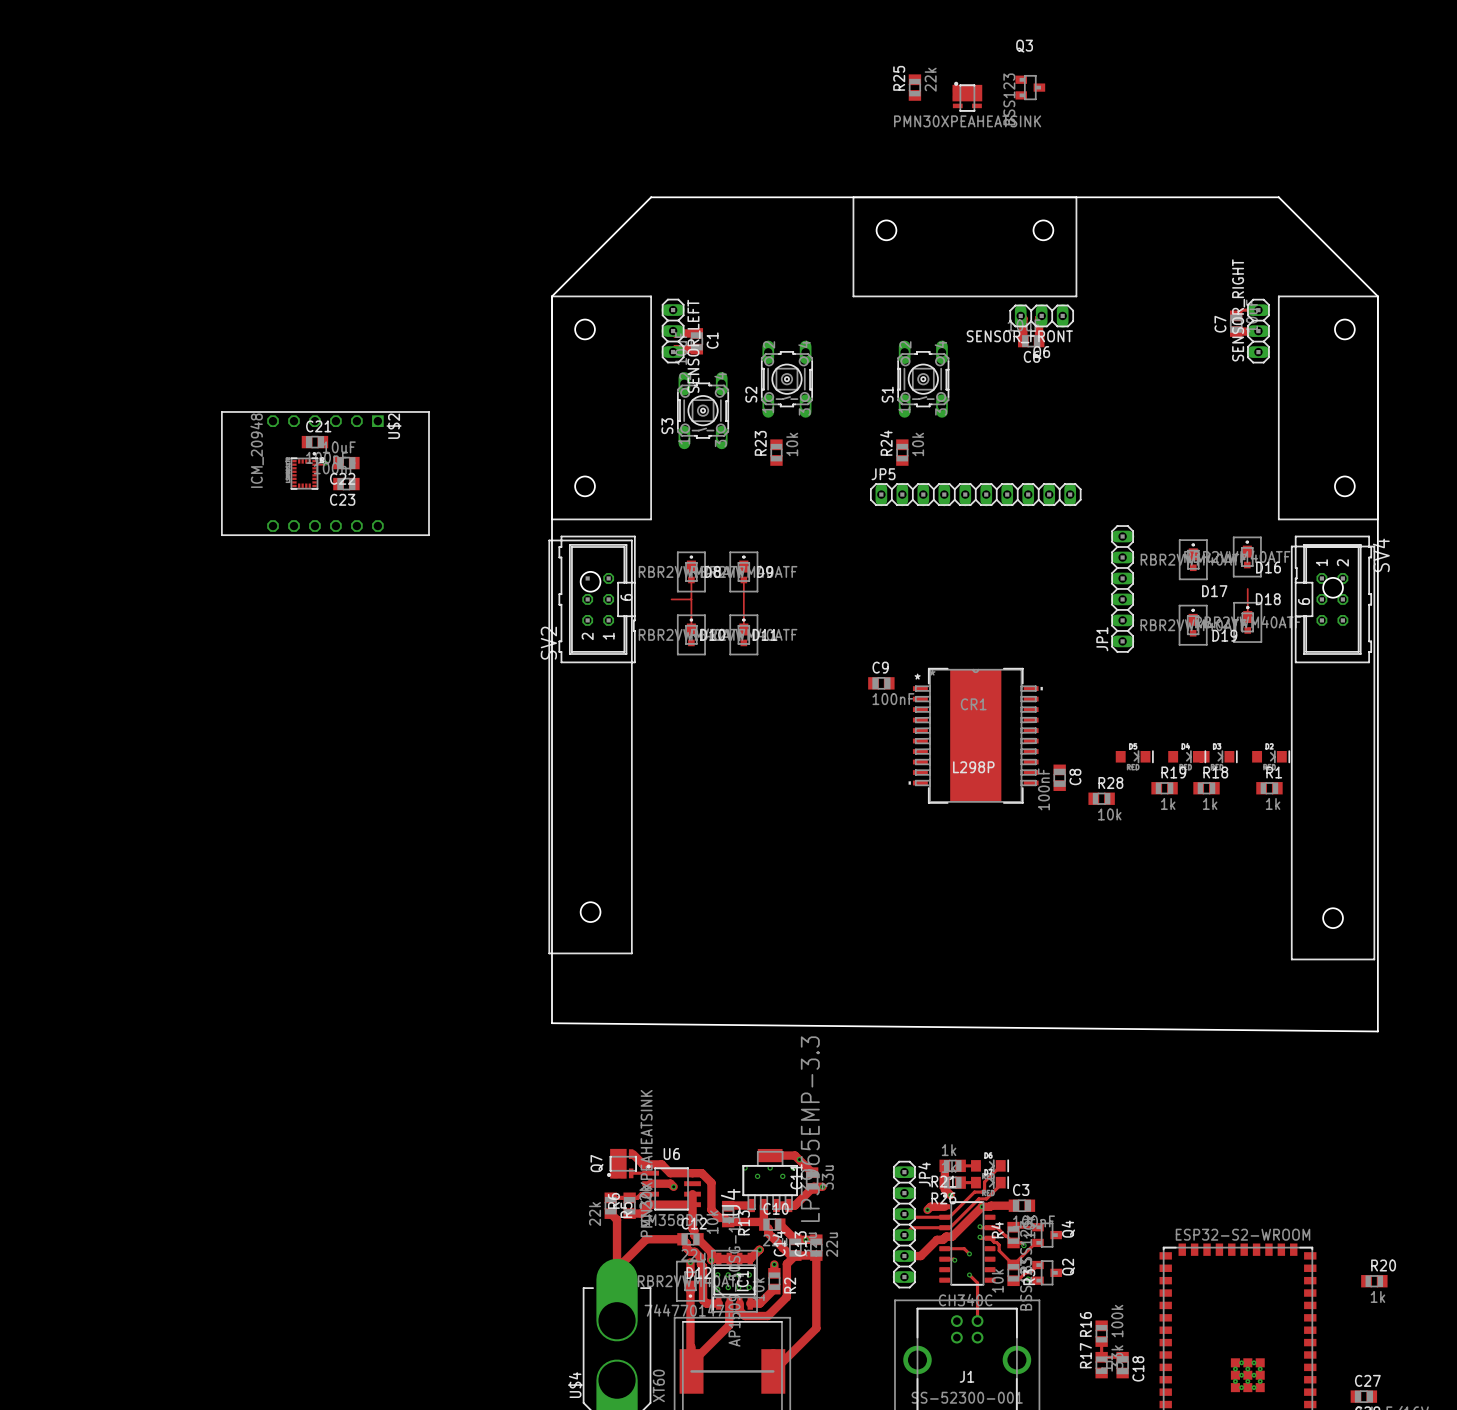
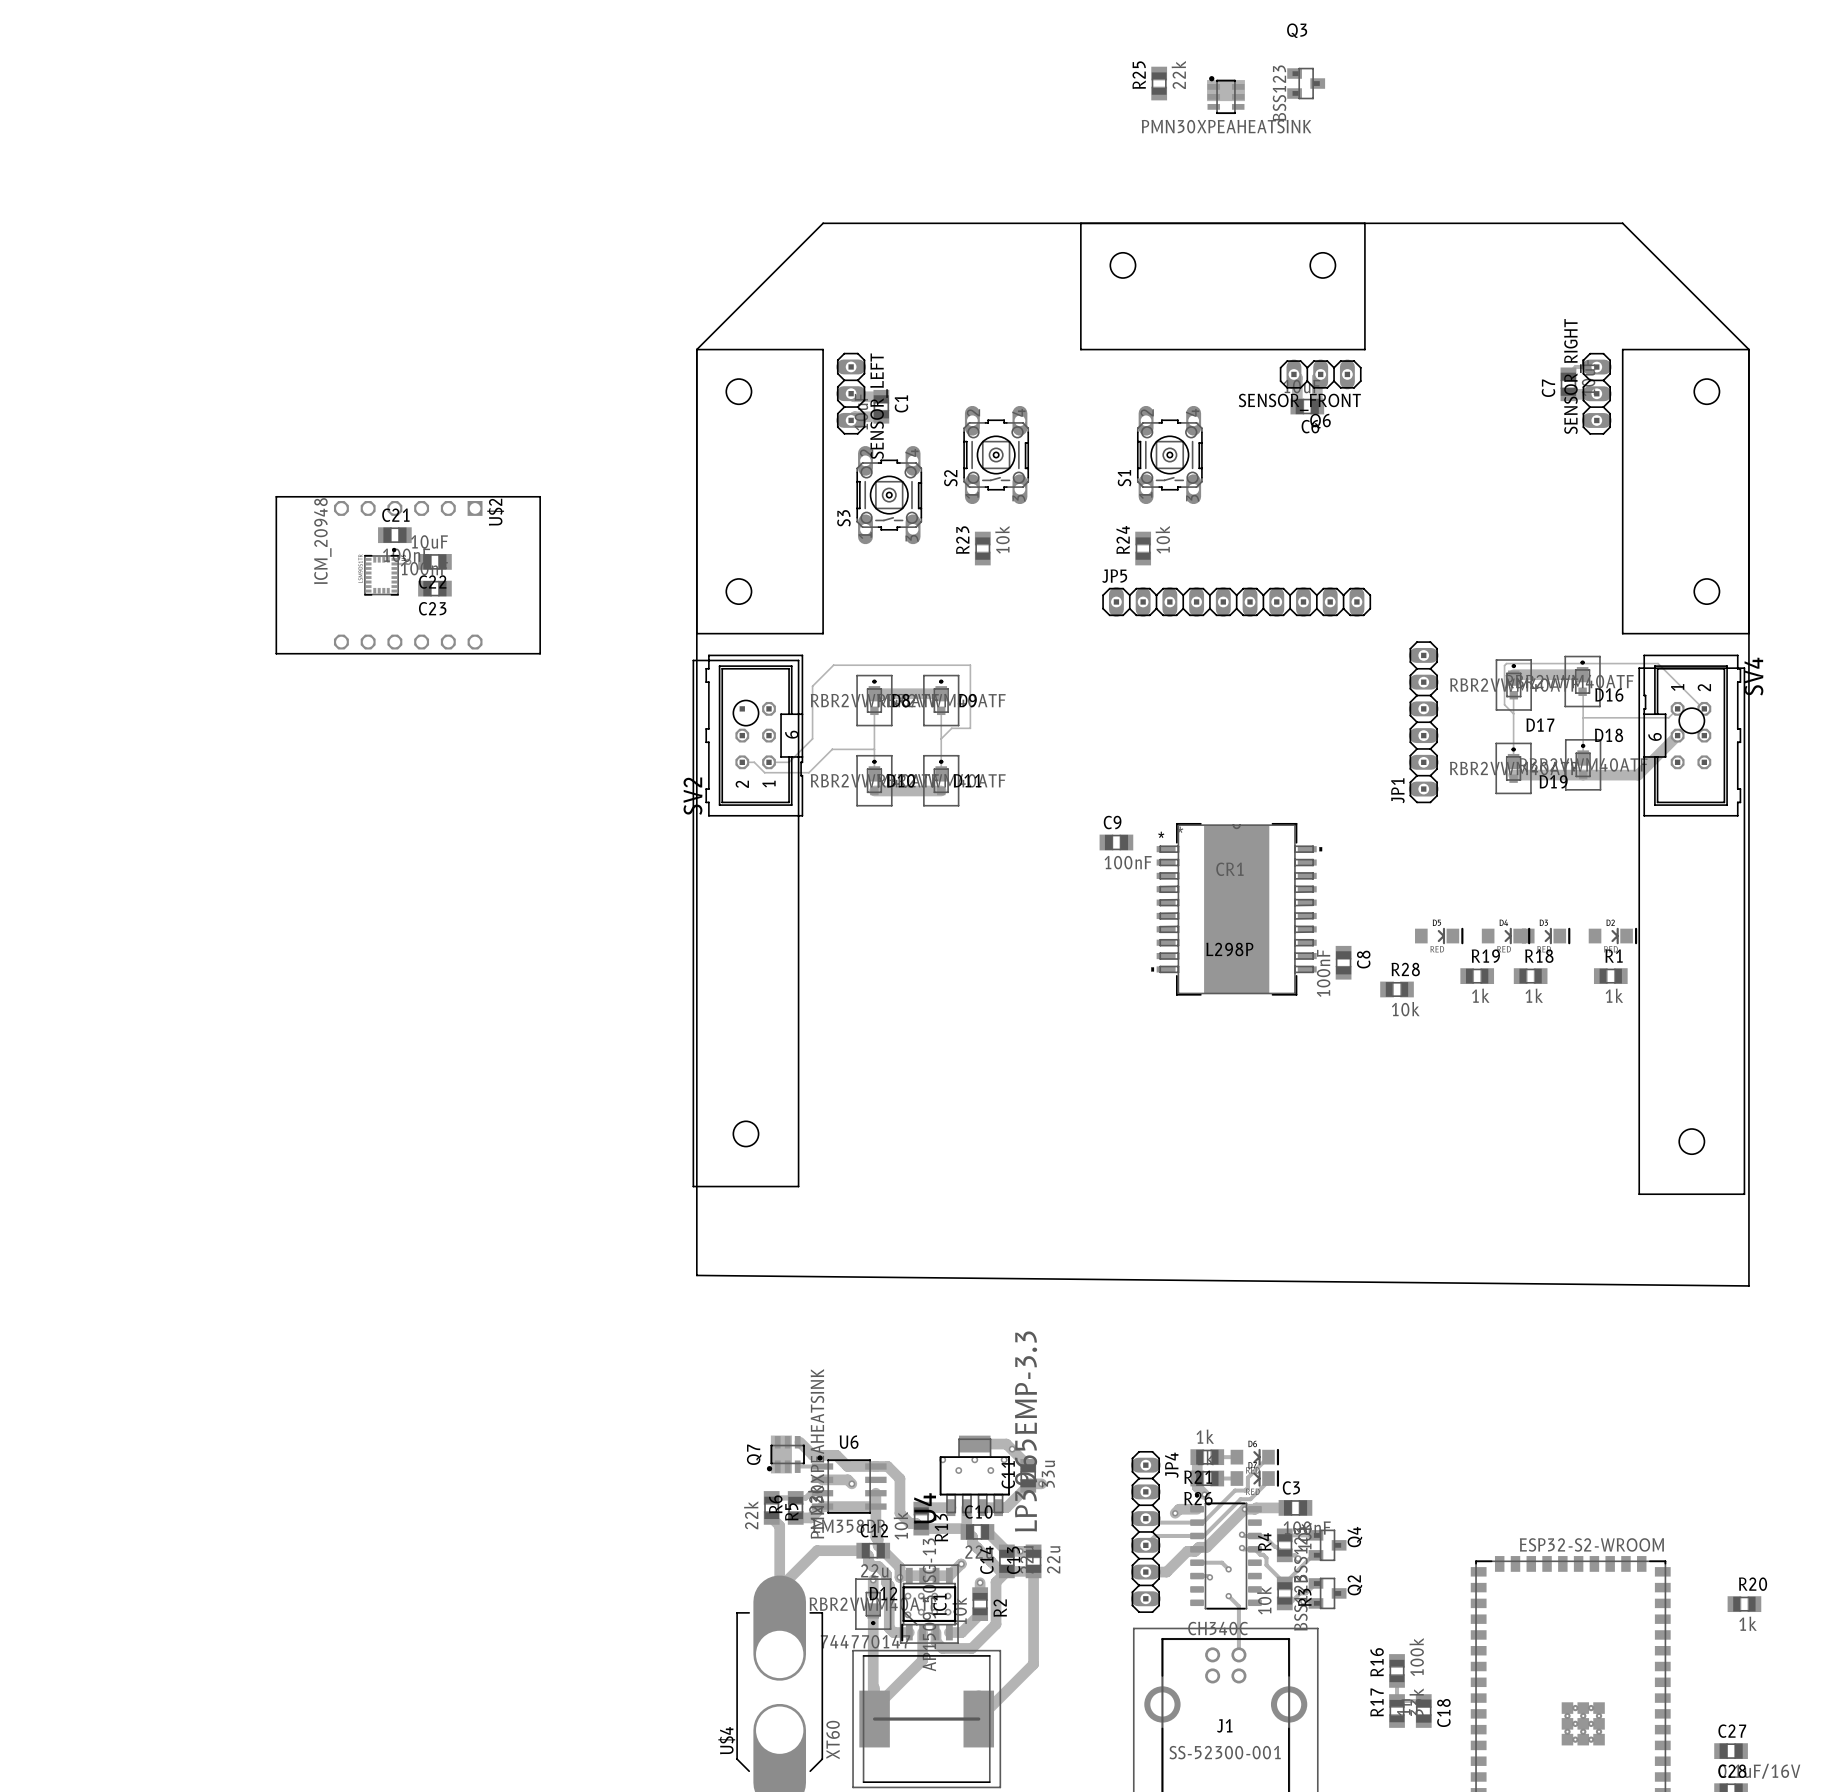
track: none -> (1513, 674) (1583, 674)
track: none -> (1513, 691) (1513, 758)
track: none -> (1583, 691) (1583, 722)
track: none -> (874, 693) (941, 693)
track: none -> (1677, 708) (1668, 717) (1583, 717)
track: none -> (1704, 708) (1658, 663) (1506, 663) (1504, 665) (1504, 704) (1513, 713)
track: (671, 599) (691, 599) -> none
track: none -> (1677, 736) (1638, 775) (1513, 775)
track: none -> (941, 738) (951, 728) (970, 728) (970, 665) (833, 665) (812, 686) (812, 738) (789, 762) (769, 762)
track: none -> (874, 749) (832, 749) (808, 772) (764, 772) (754, 762) (742, 762)
track: none -> (874, 790) (941, 790)

